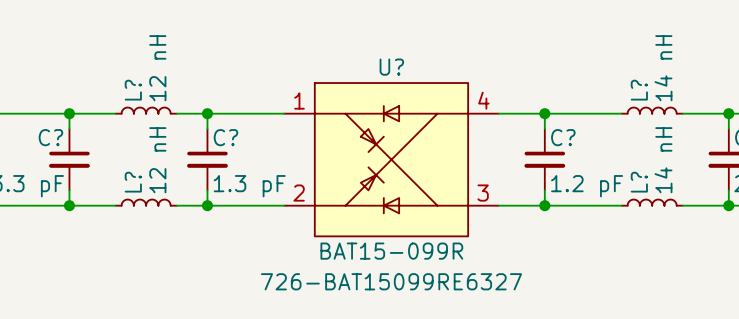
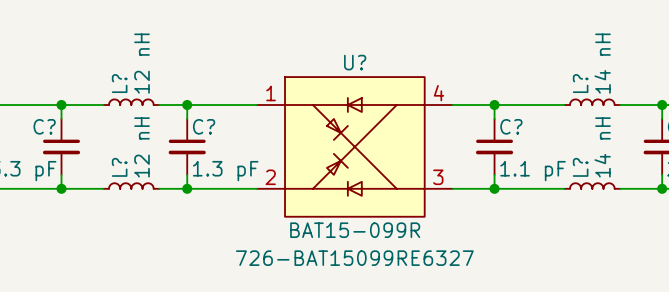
C? value: 1.2 pF (587, 186) -> 1.1 pF (533, 171)

